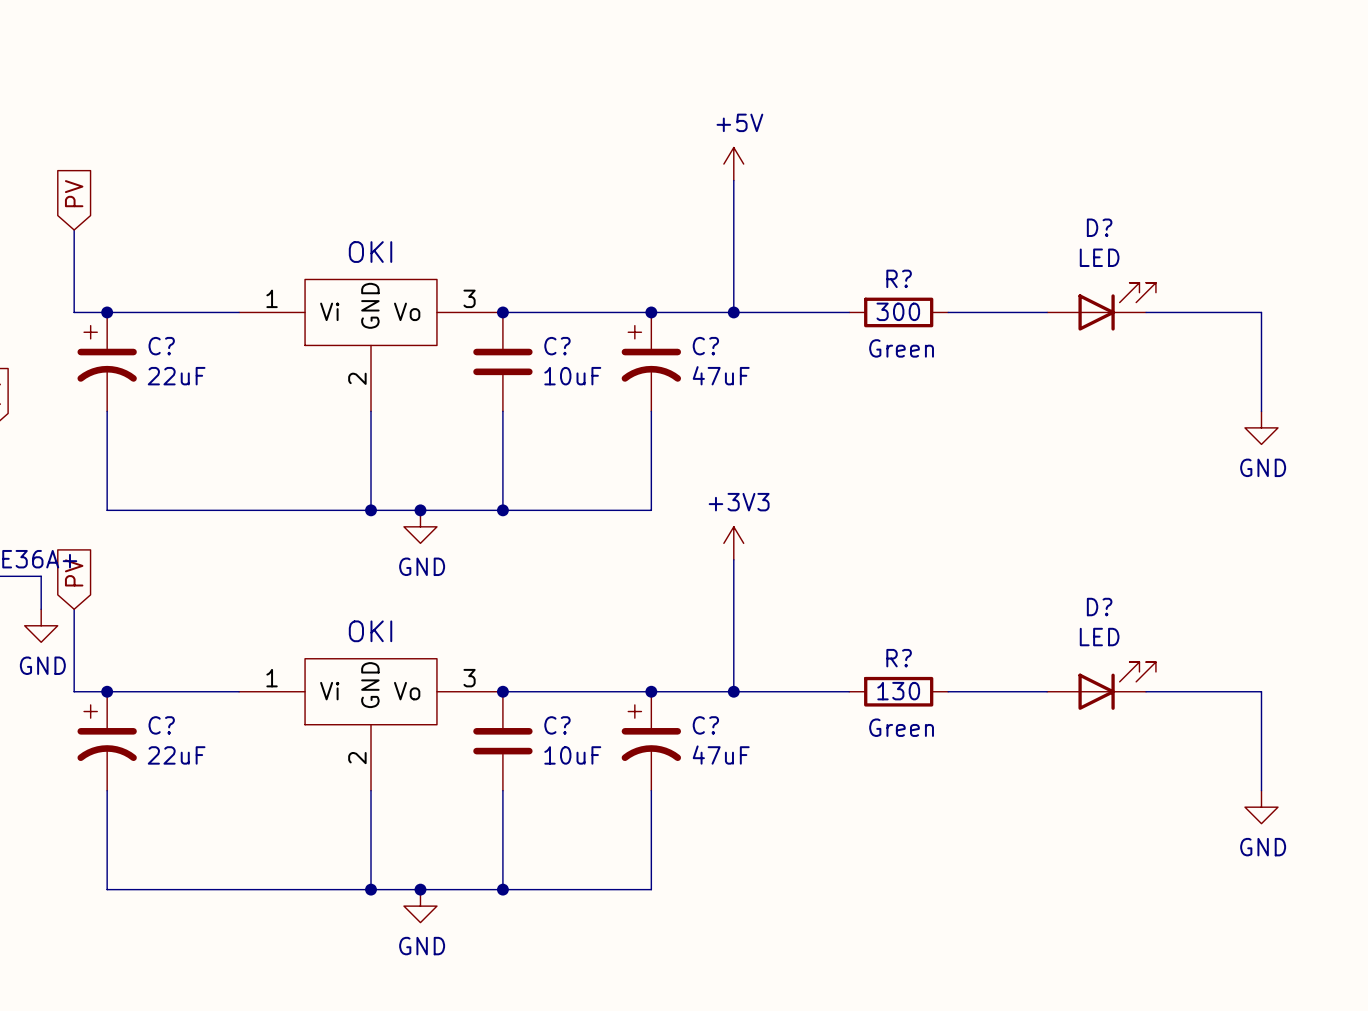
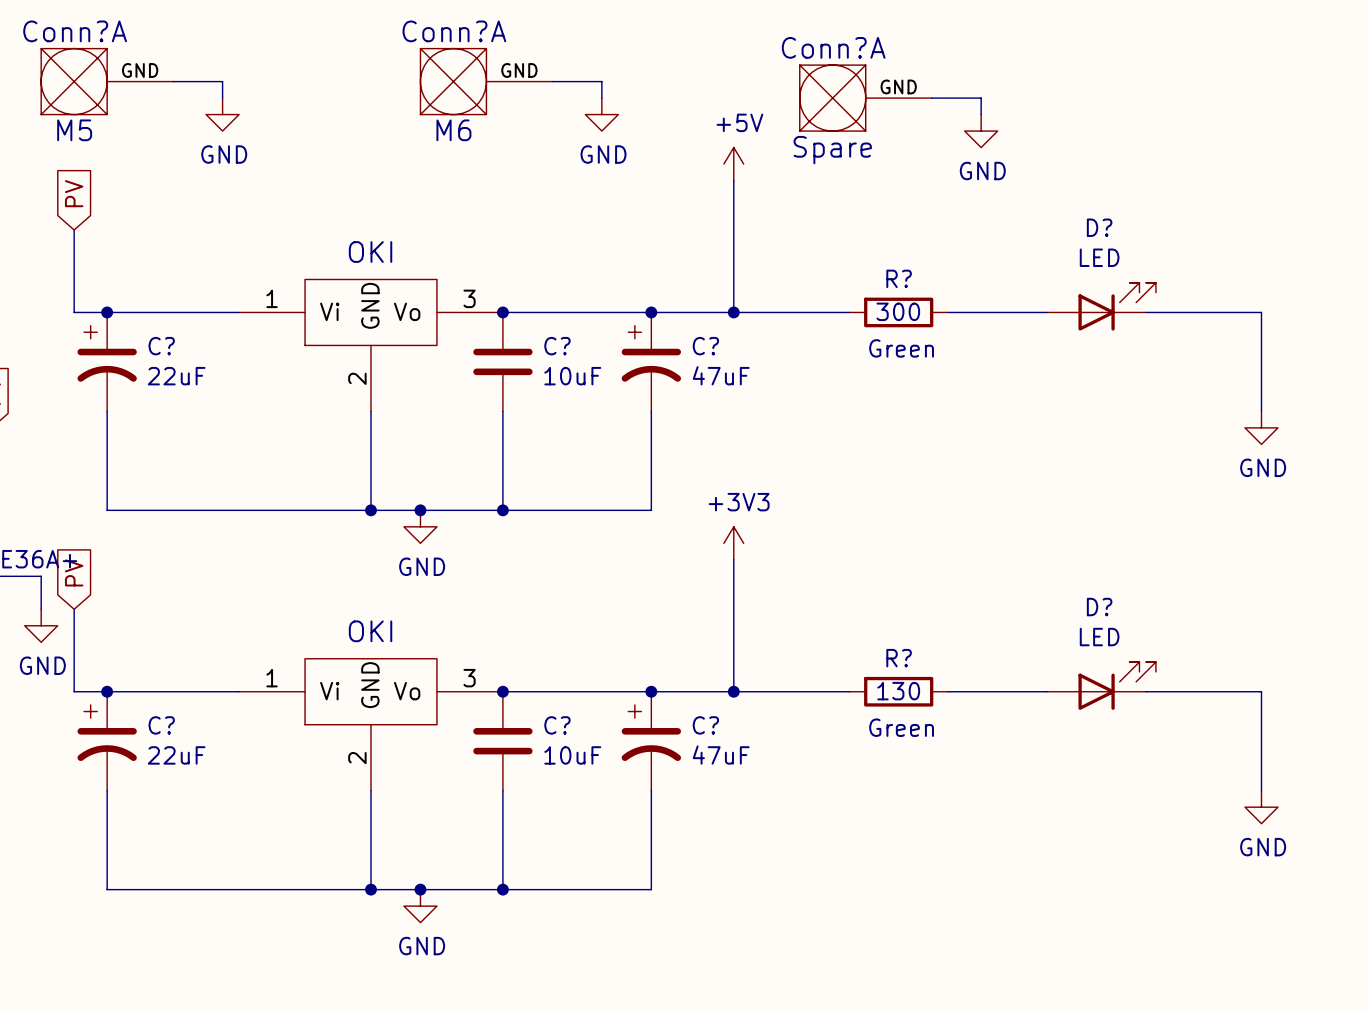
Conn?A: none -> M5 (107, 81)
wire: none -> (173, 81) (222, 81) (222, 98)
Conn?A: none -> M6 (486, 81)
wire: none -> (552, 81) (601, 81) (601, 98)
Conn?A: none -> Spare (865, 98)
wire: none -> (931, 98) (981, 98) (981, 114)
power symbol: none -> GND (222, 114)
power symbol: none -> GND (601, 114)
power symbol: none -> GND (981, 131)

